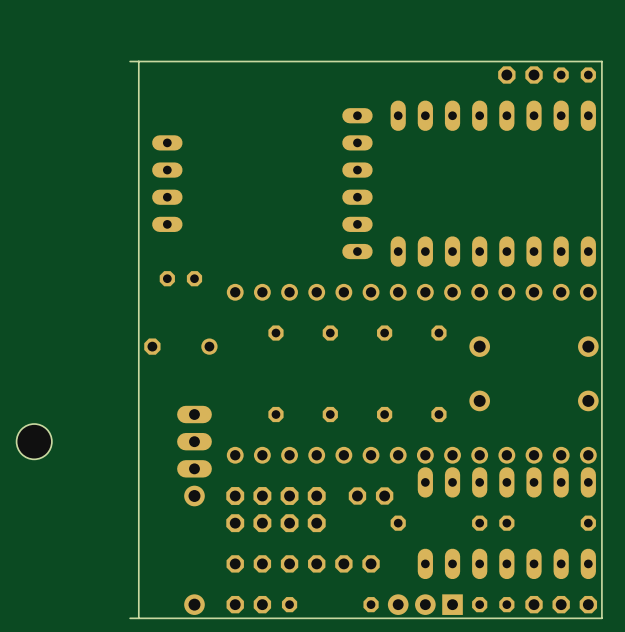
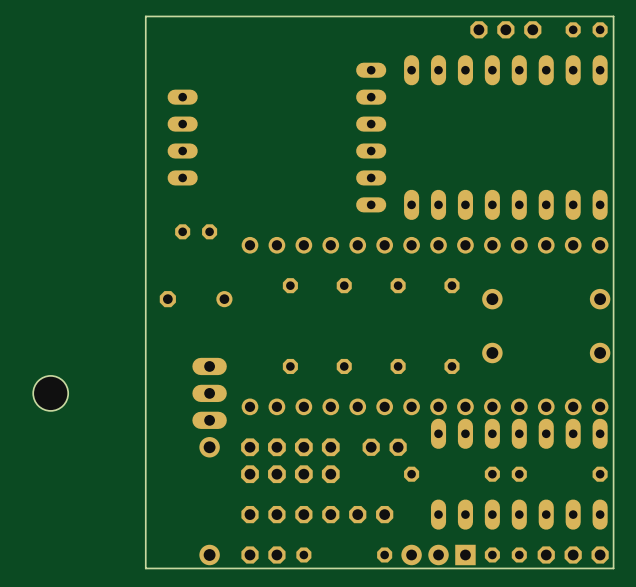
board edge: (138, 61) (138, 618) -> none
part: none -> (478, 29)
part: none -> (505, 29)
part: (506, 74) -> none
part: none -> (532, 29)
part: (534, 74) -> none
board edge: (601, 618) (130, 618) -> (613, 568) (145, 568) (145, 16)

